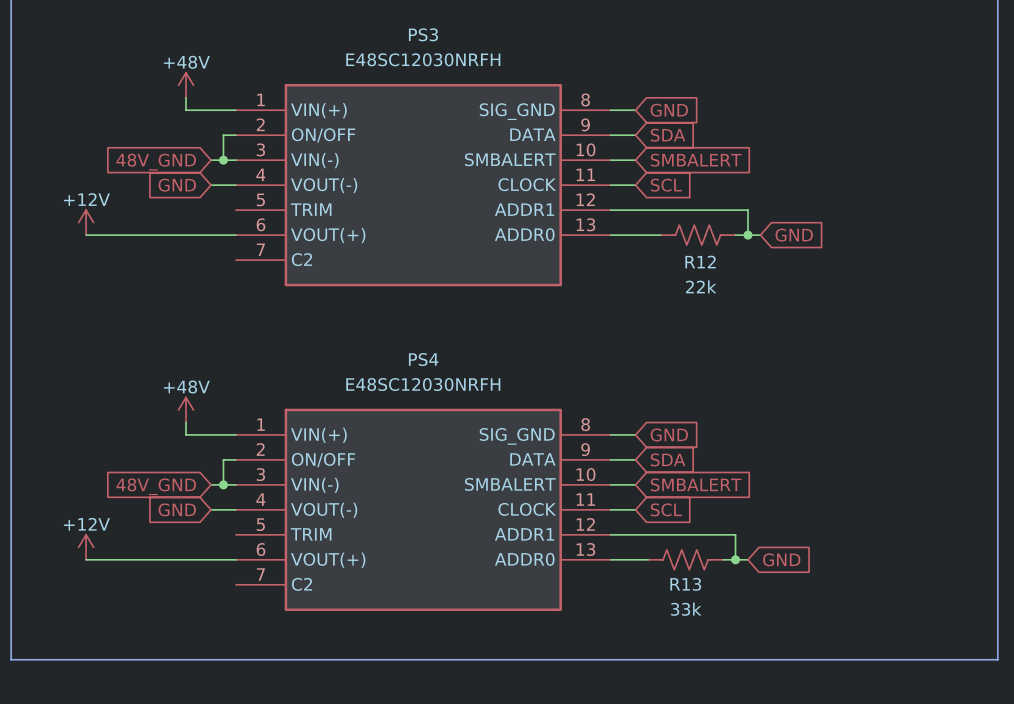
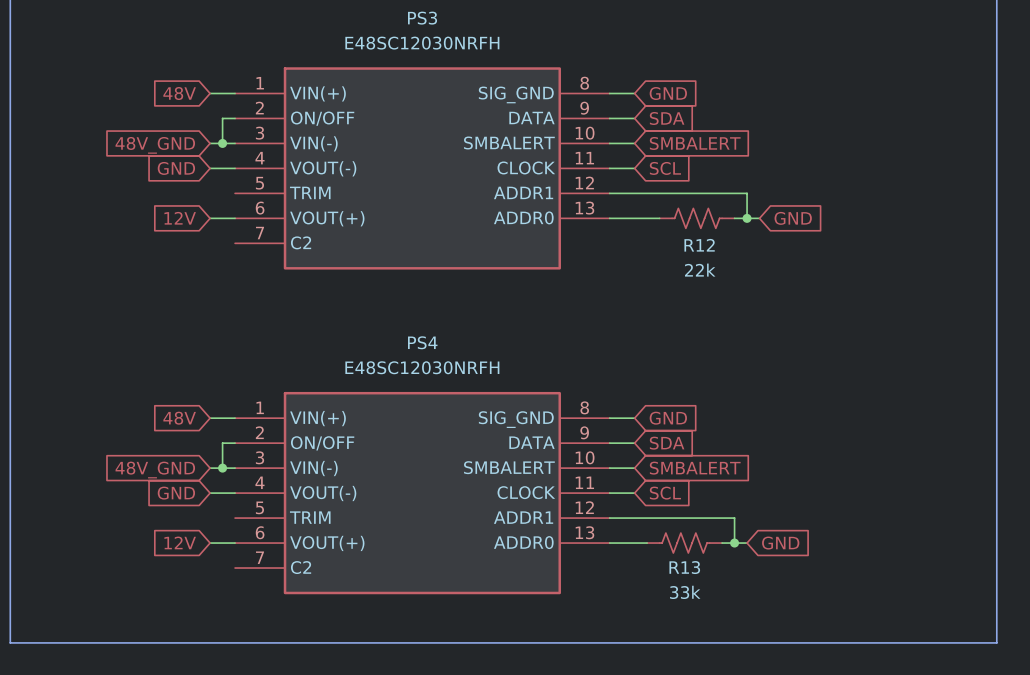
power symbol: +48V (186, 85) -> none
wire: (186, 97) (186, 110) (210, 110) -> none
global label: none -> 48V (179, 93)
power symbol: +12V (86, 222) -> none
global label: none -> 12V (180, 218)
wire: (86, 235) (210, 235) -> none
power symbol: +48V (186, 409) -> none
wire: (186, 422) (186, 434) (210, 434) -> none
global label: none -> 48V (179, 418)
power symbol: +12V (86, 547) -> none
wire: (86, 559) (210, 559) -> none
global label: none -> 12V (180, 542)

